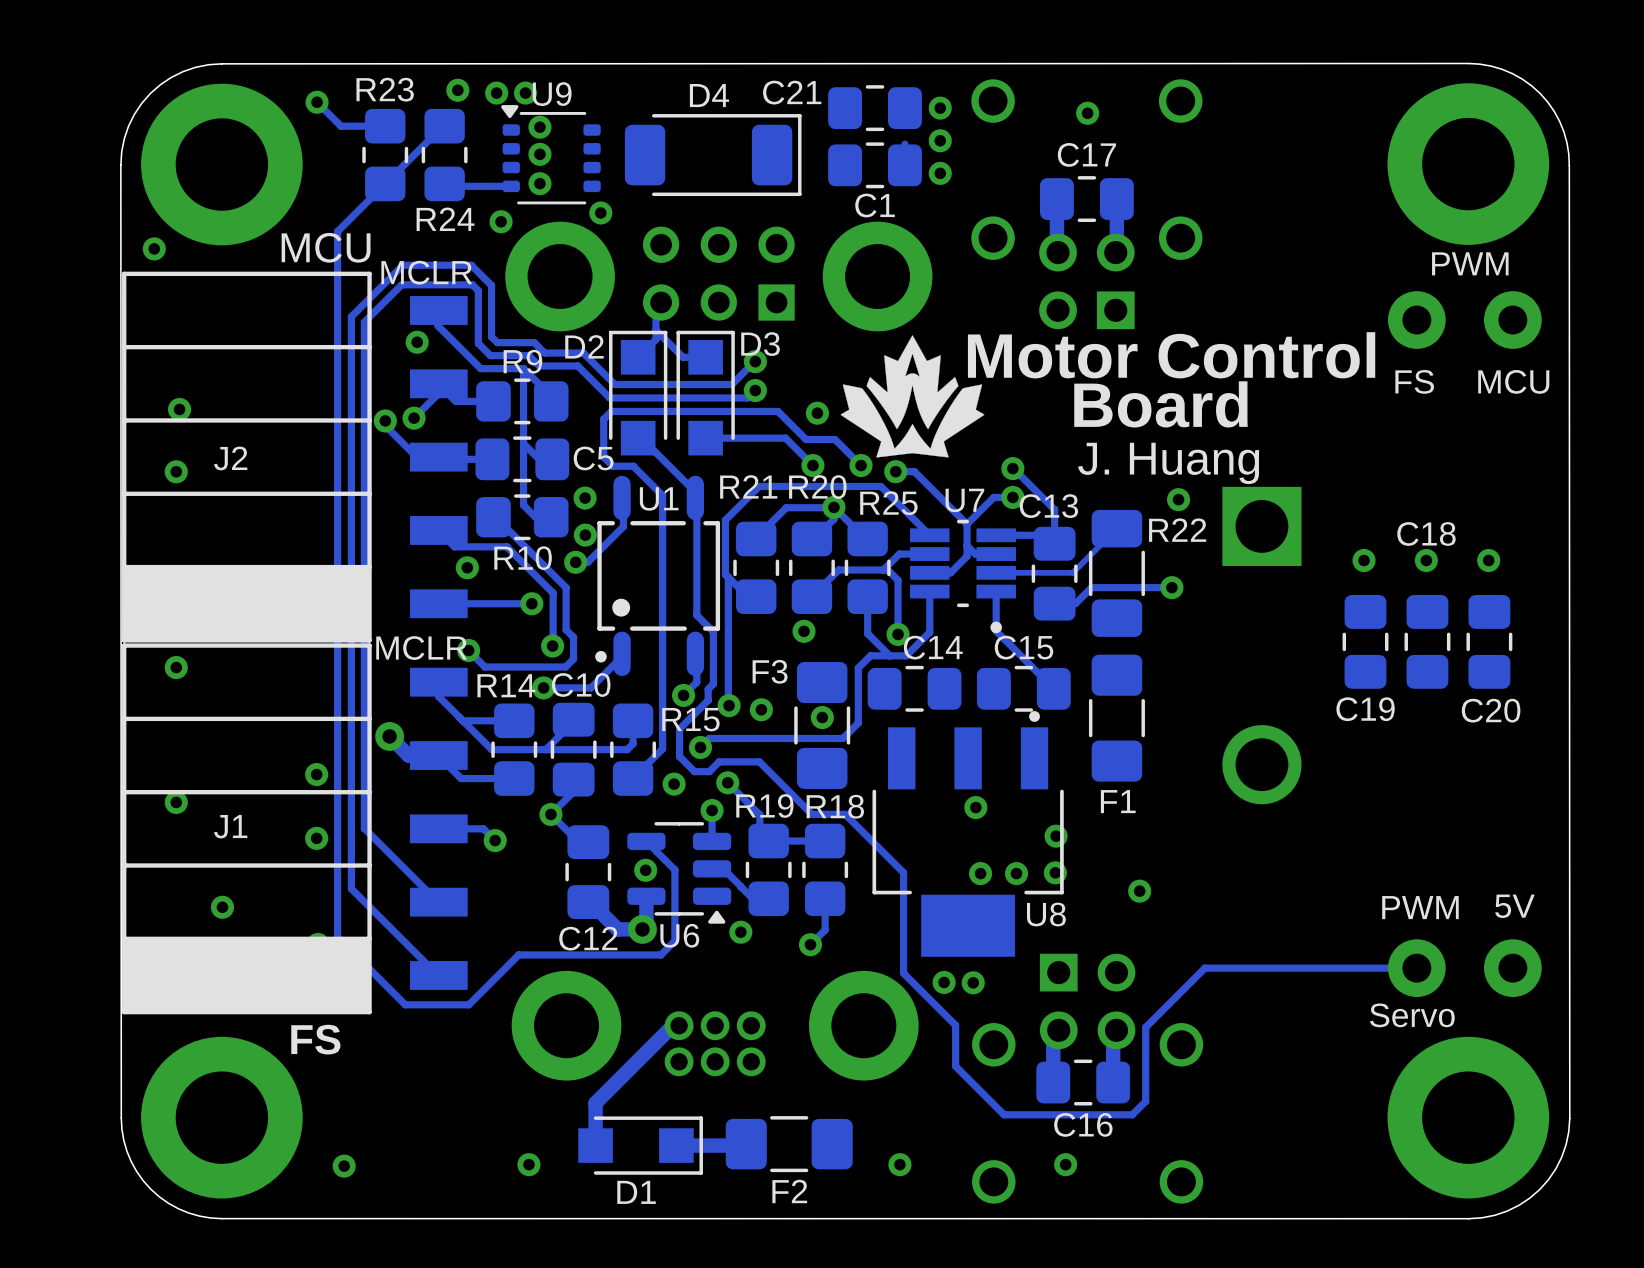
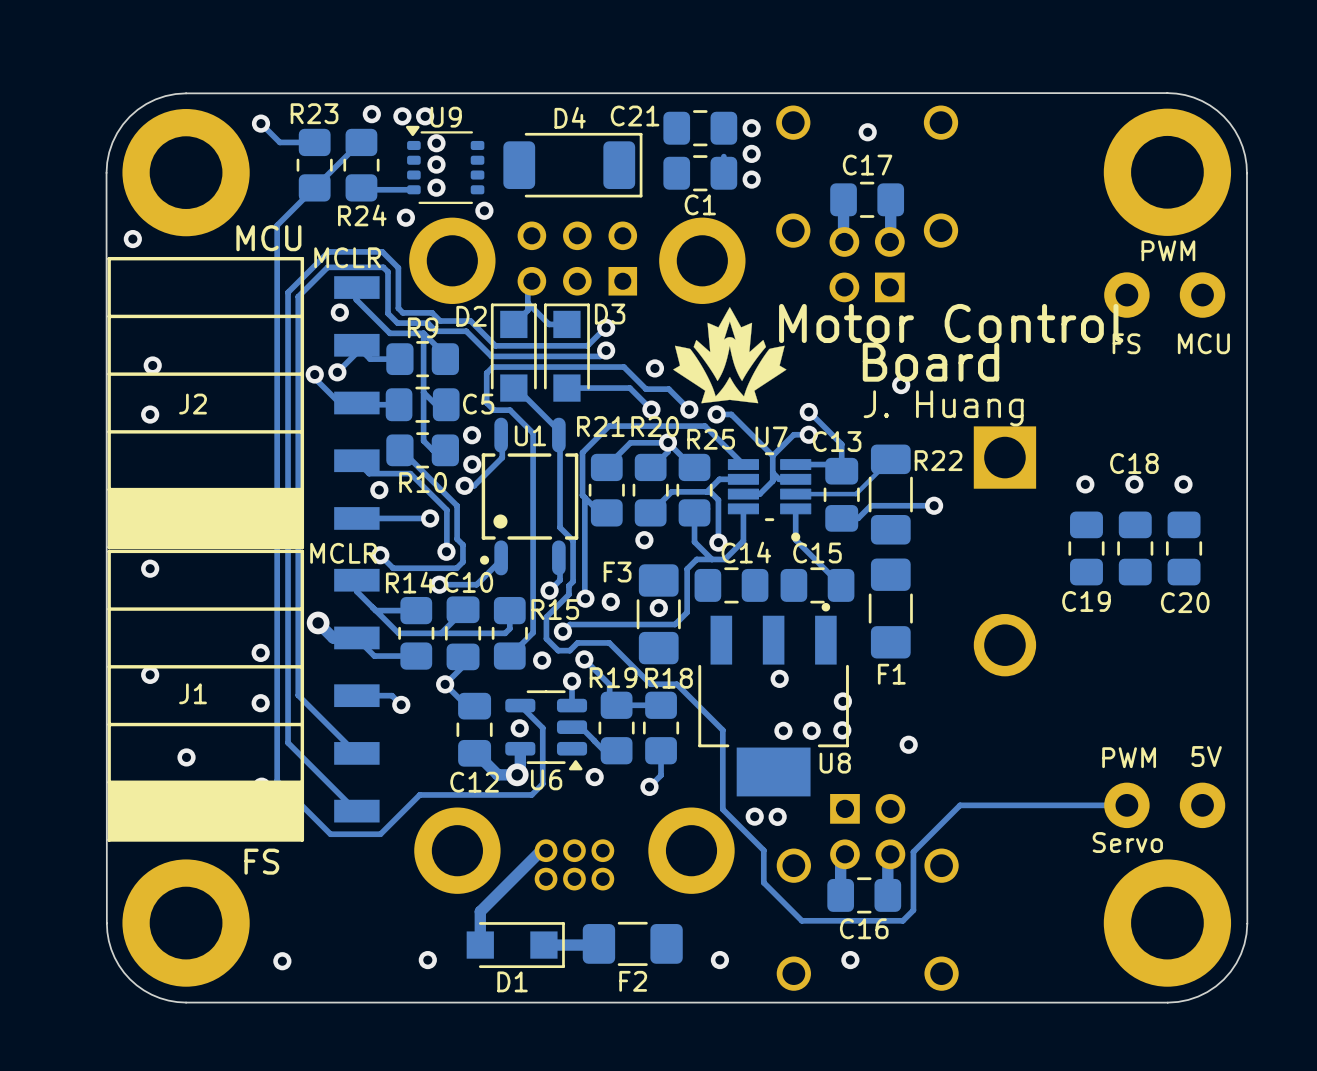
via position: (1178, 499) -> (901, 385)

